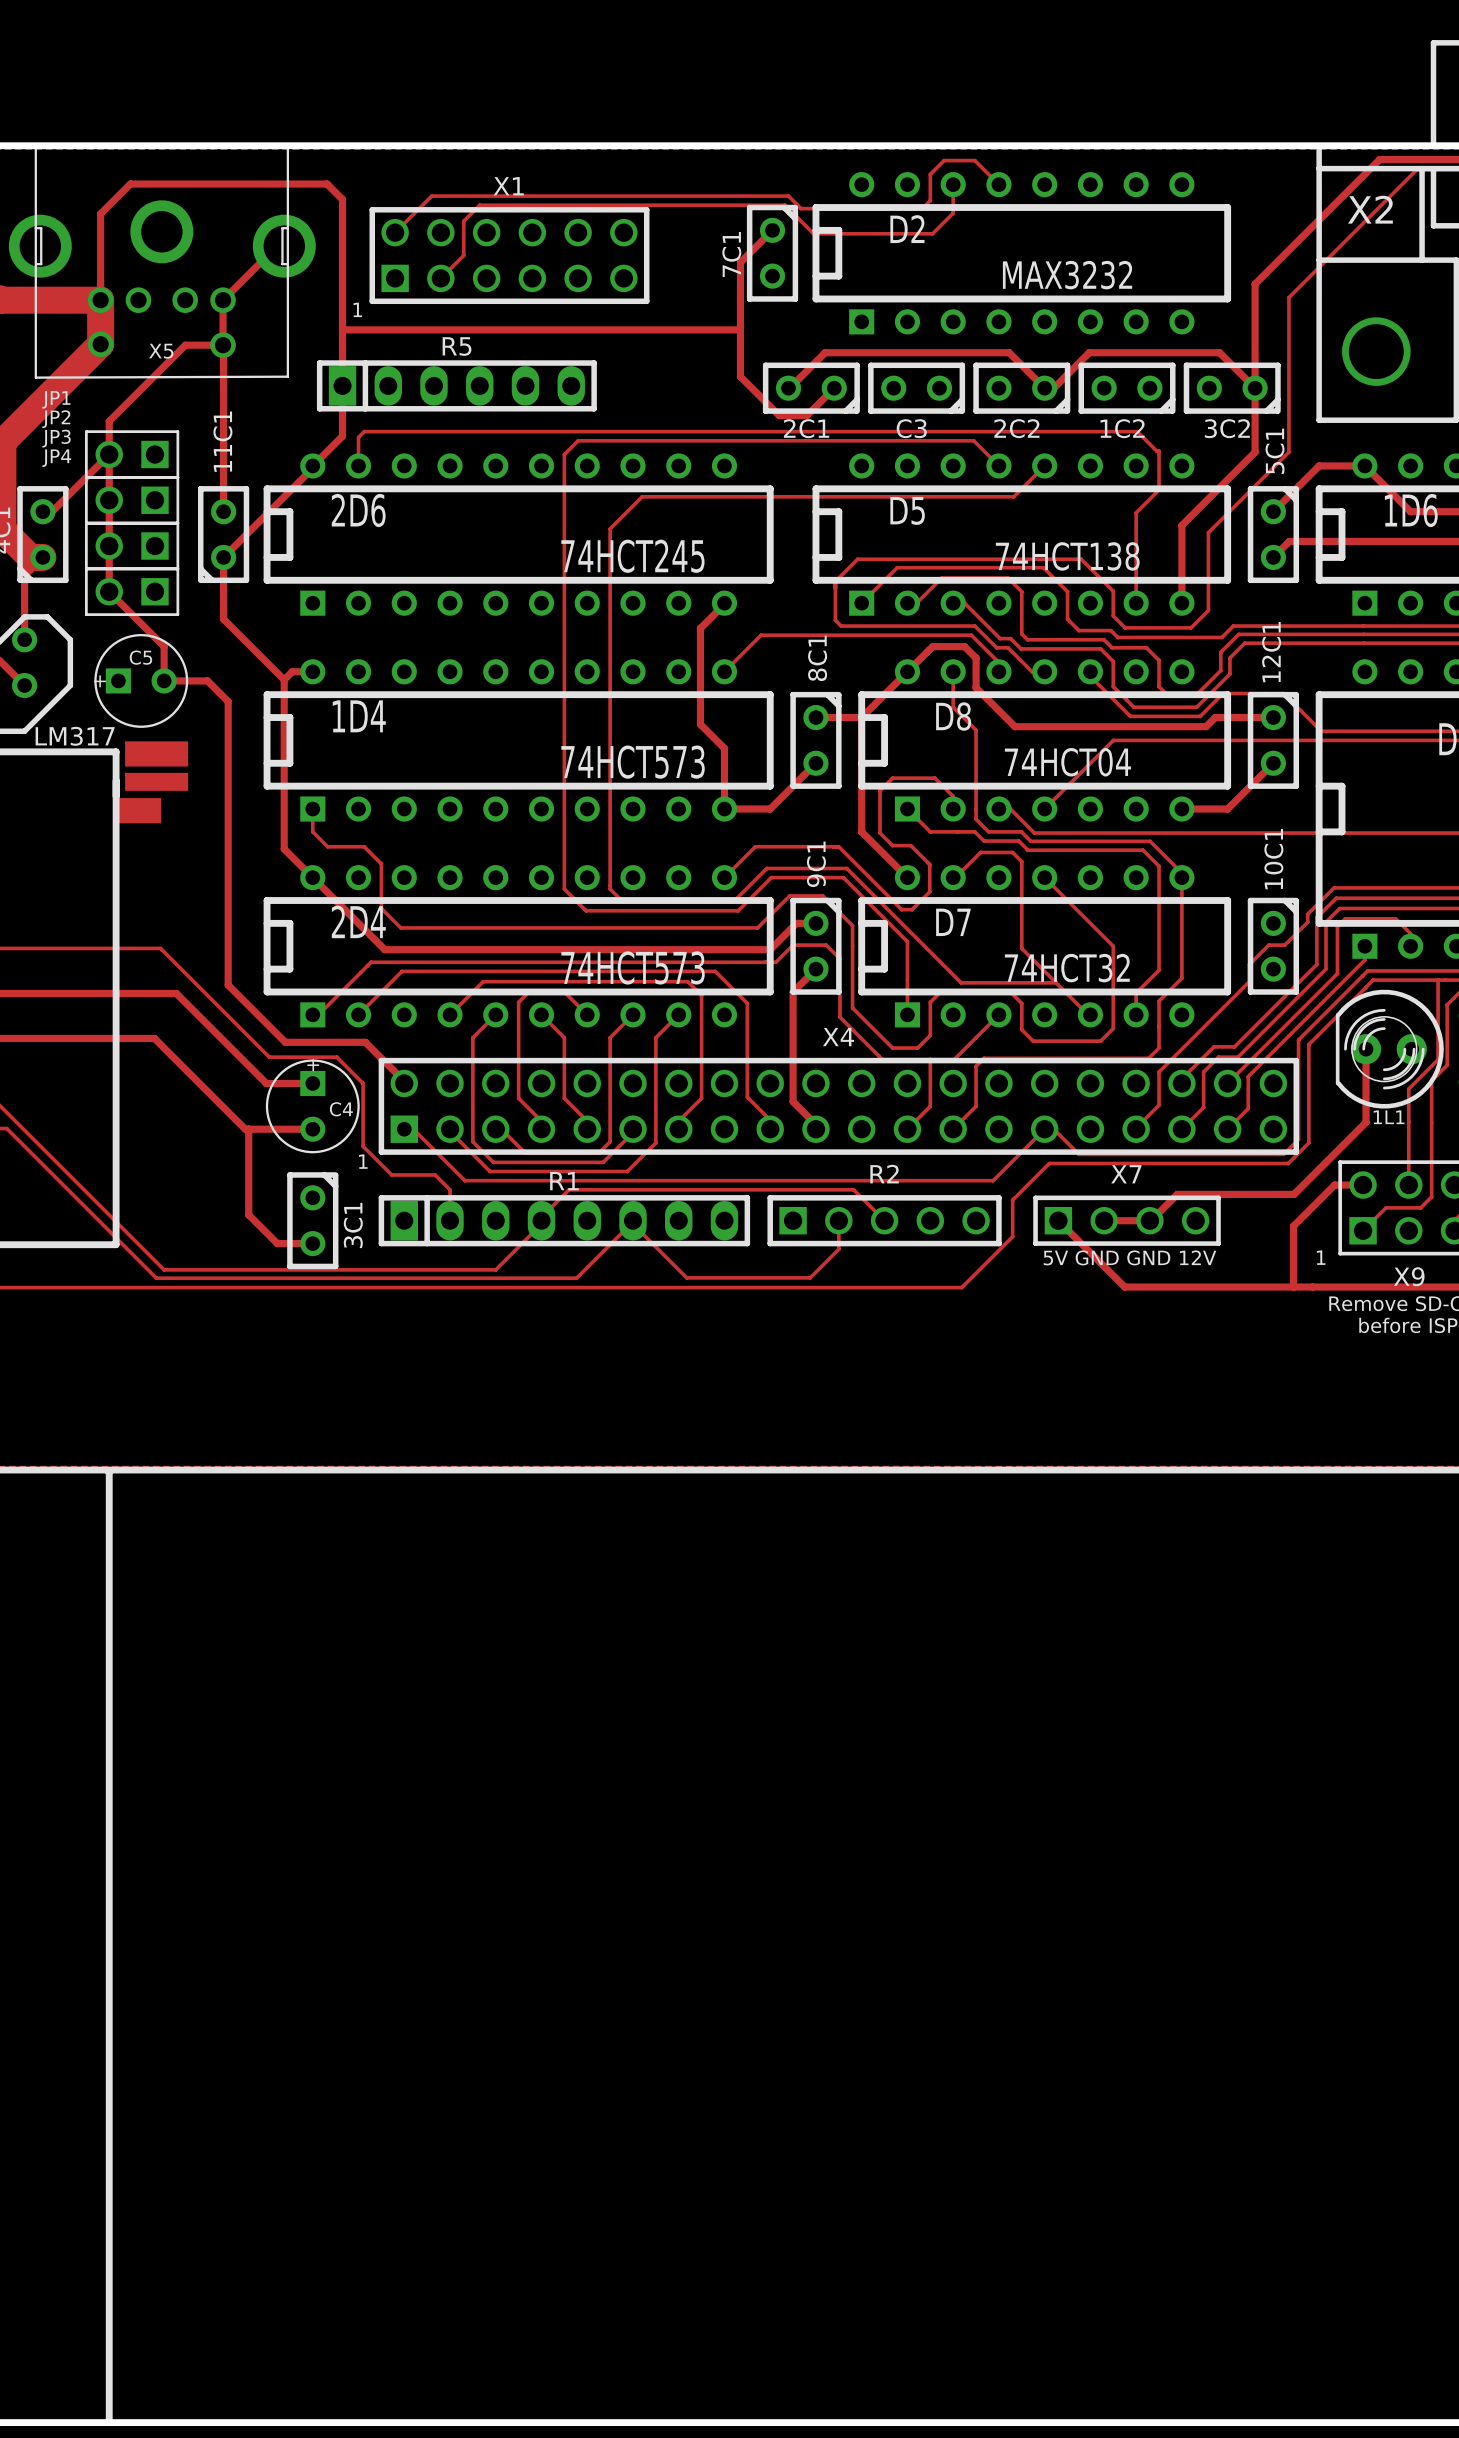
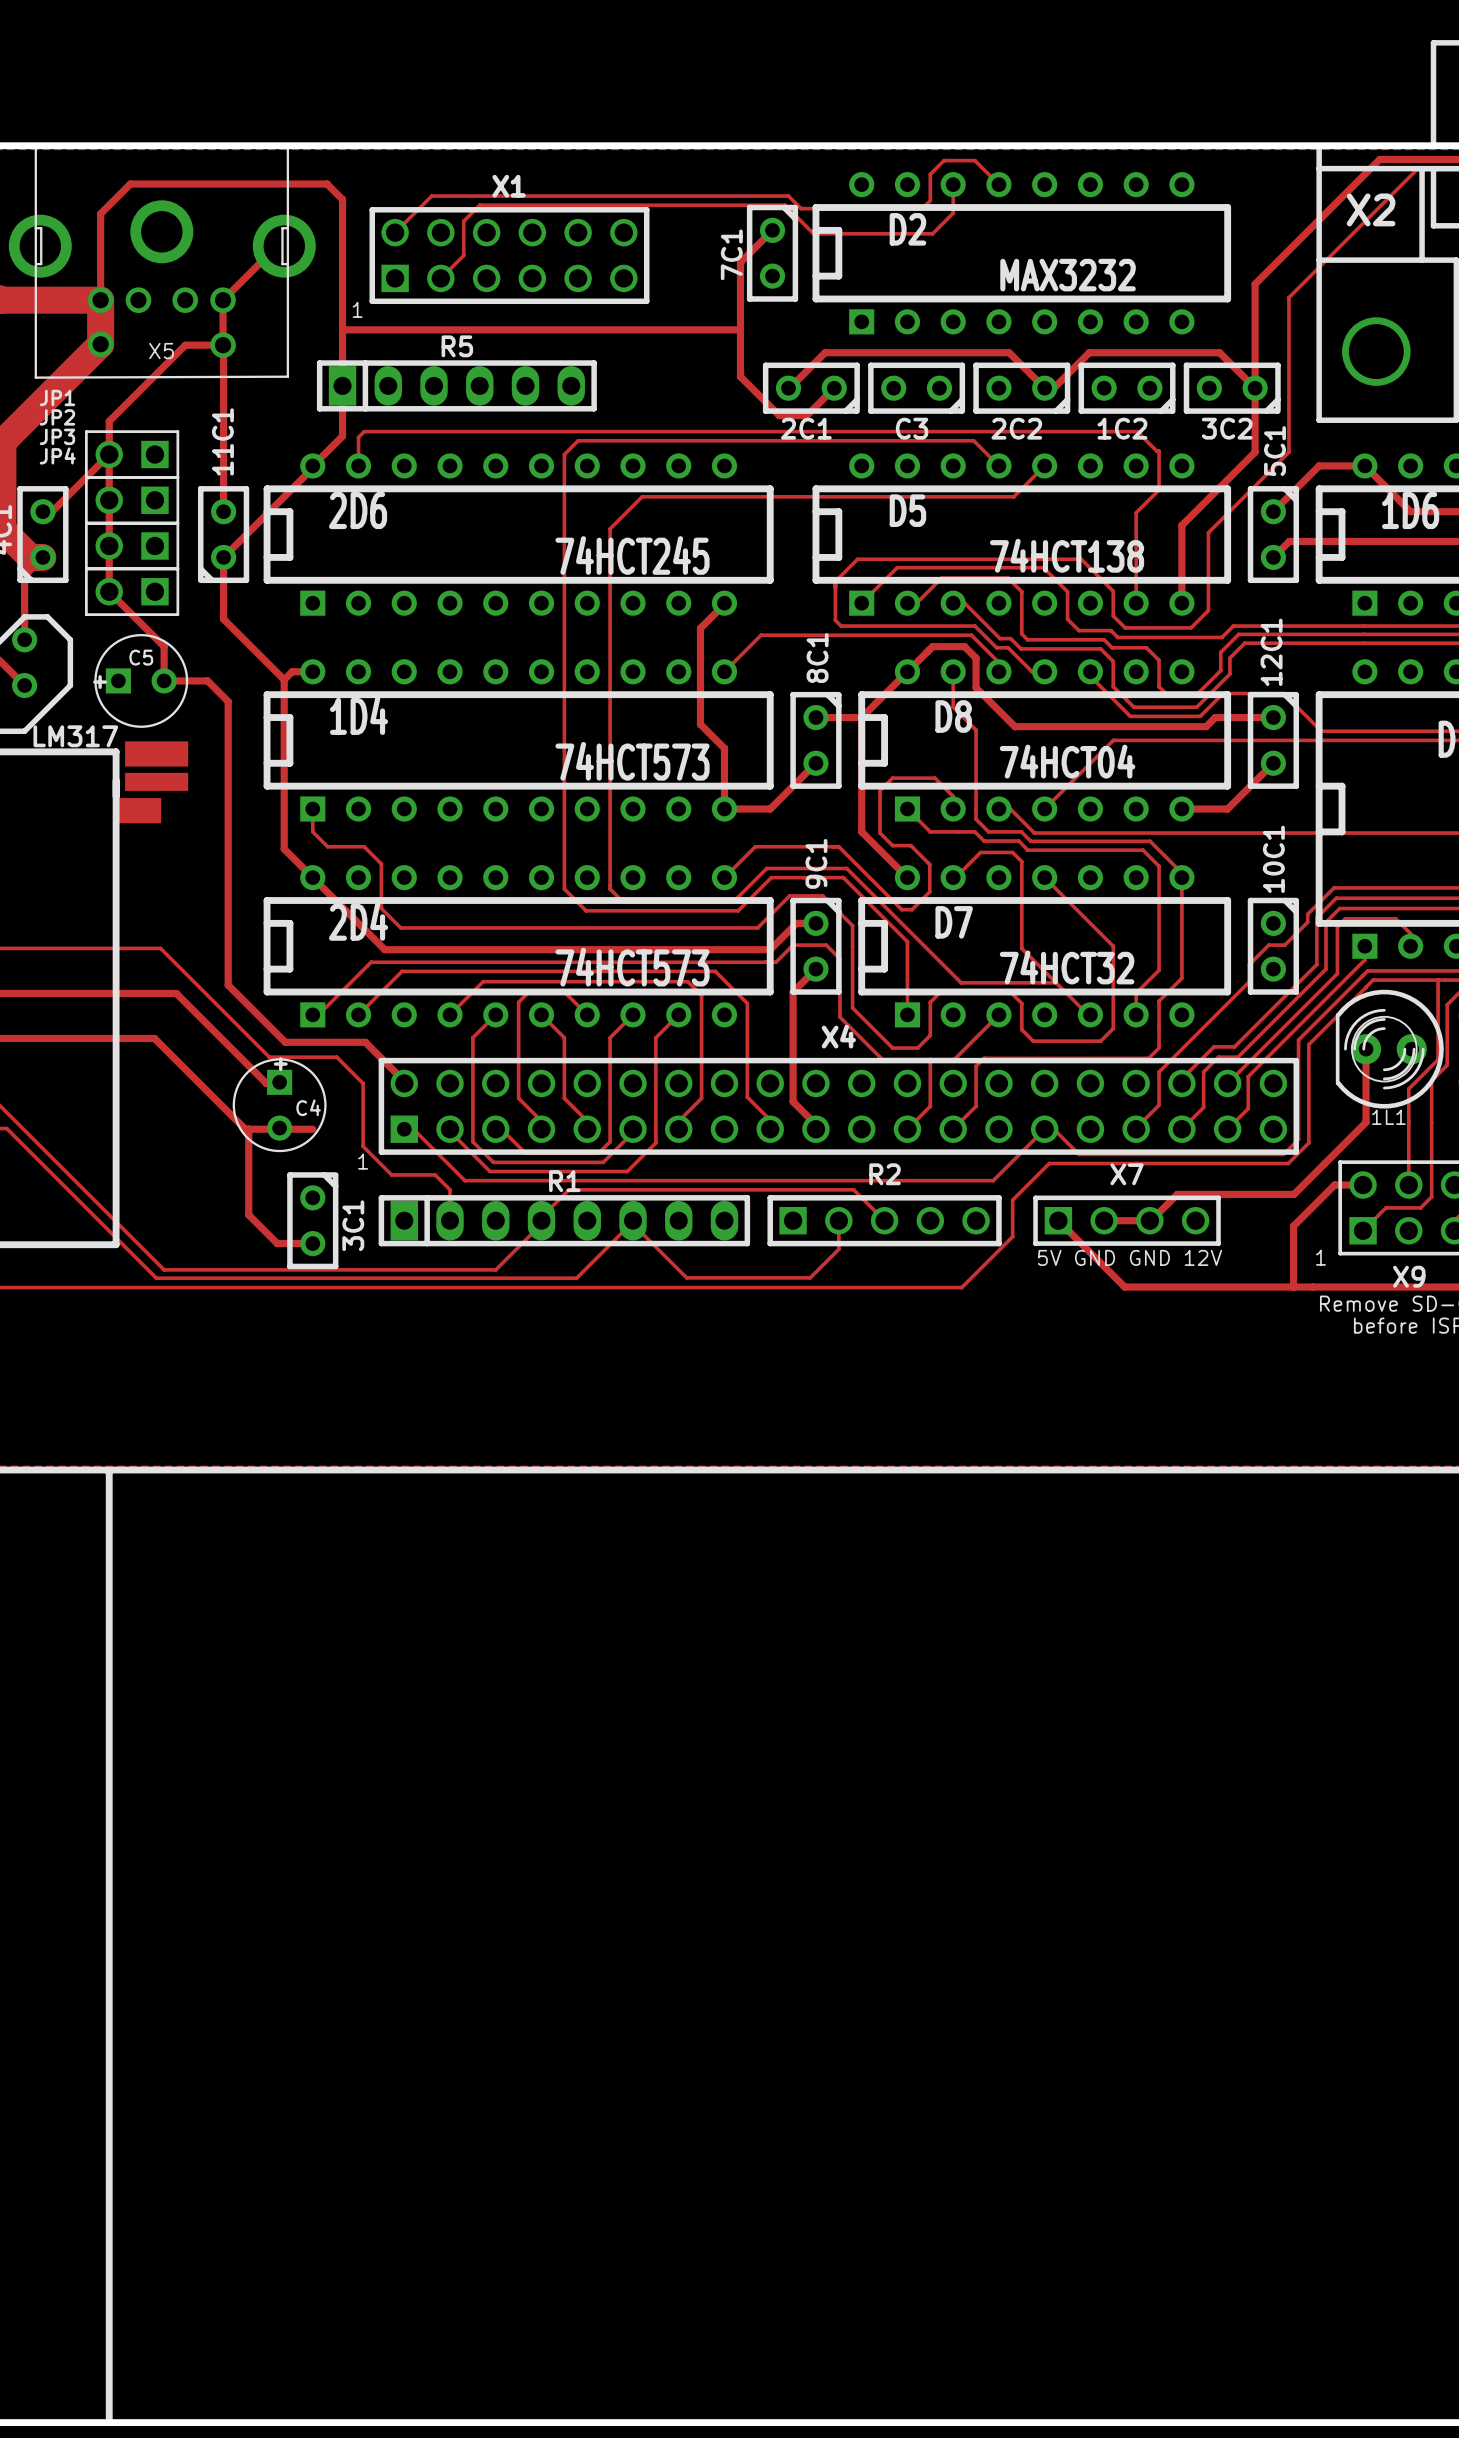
track: (281, 1083) (312, 1083) -> none
C4 position: (312, 1106) -> (279, 1105)

